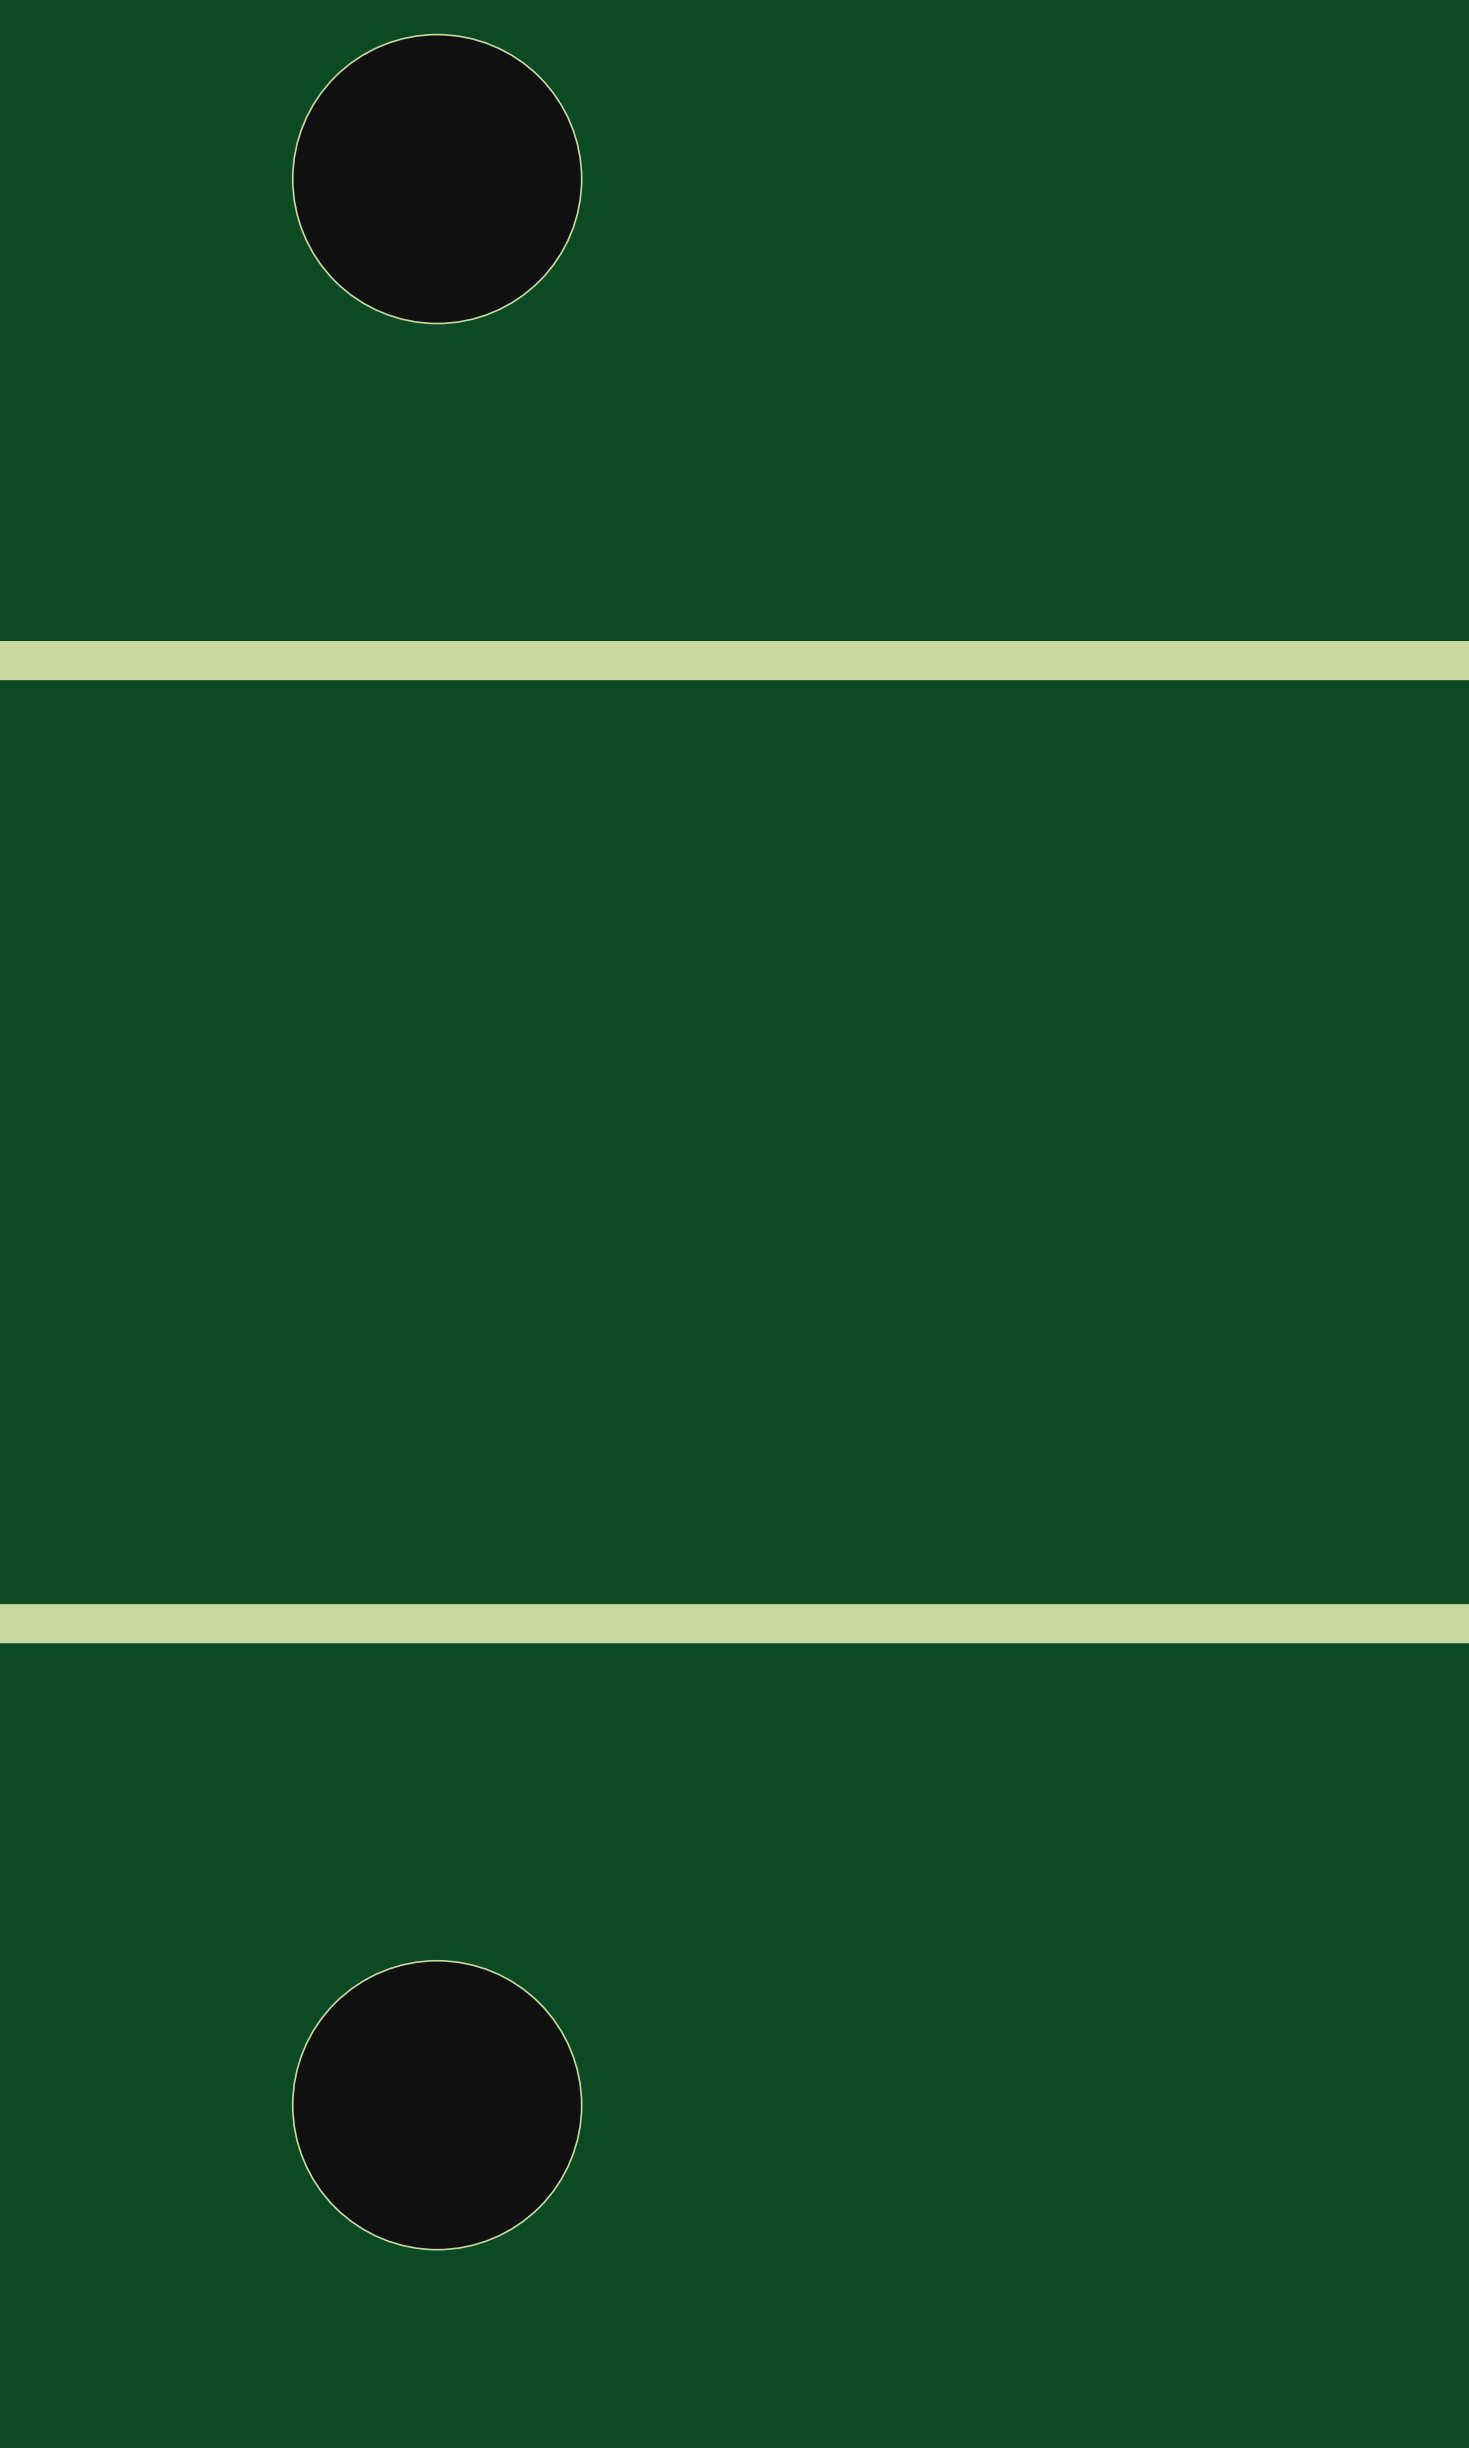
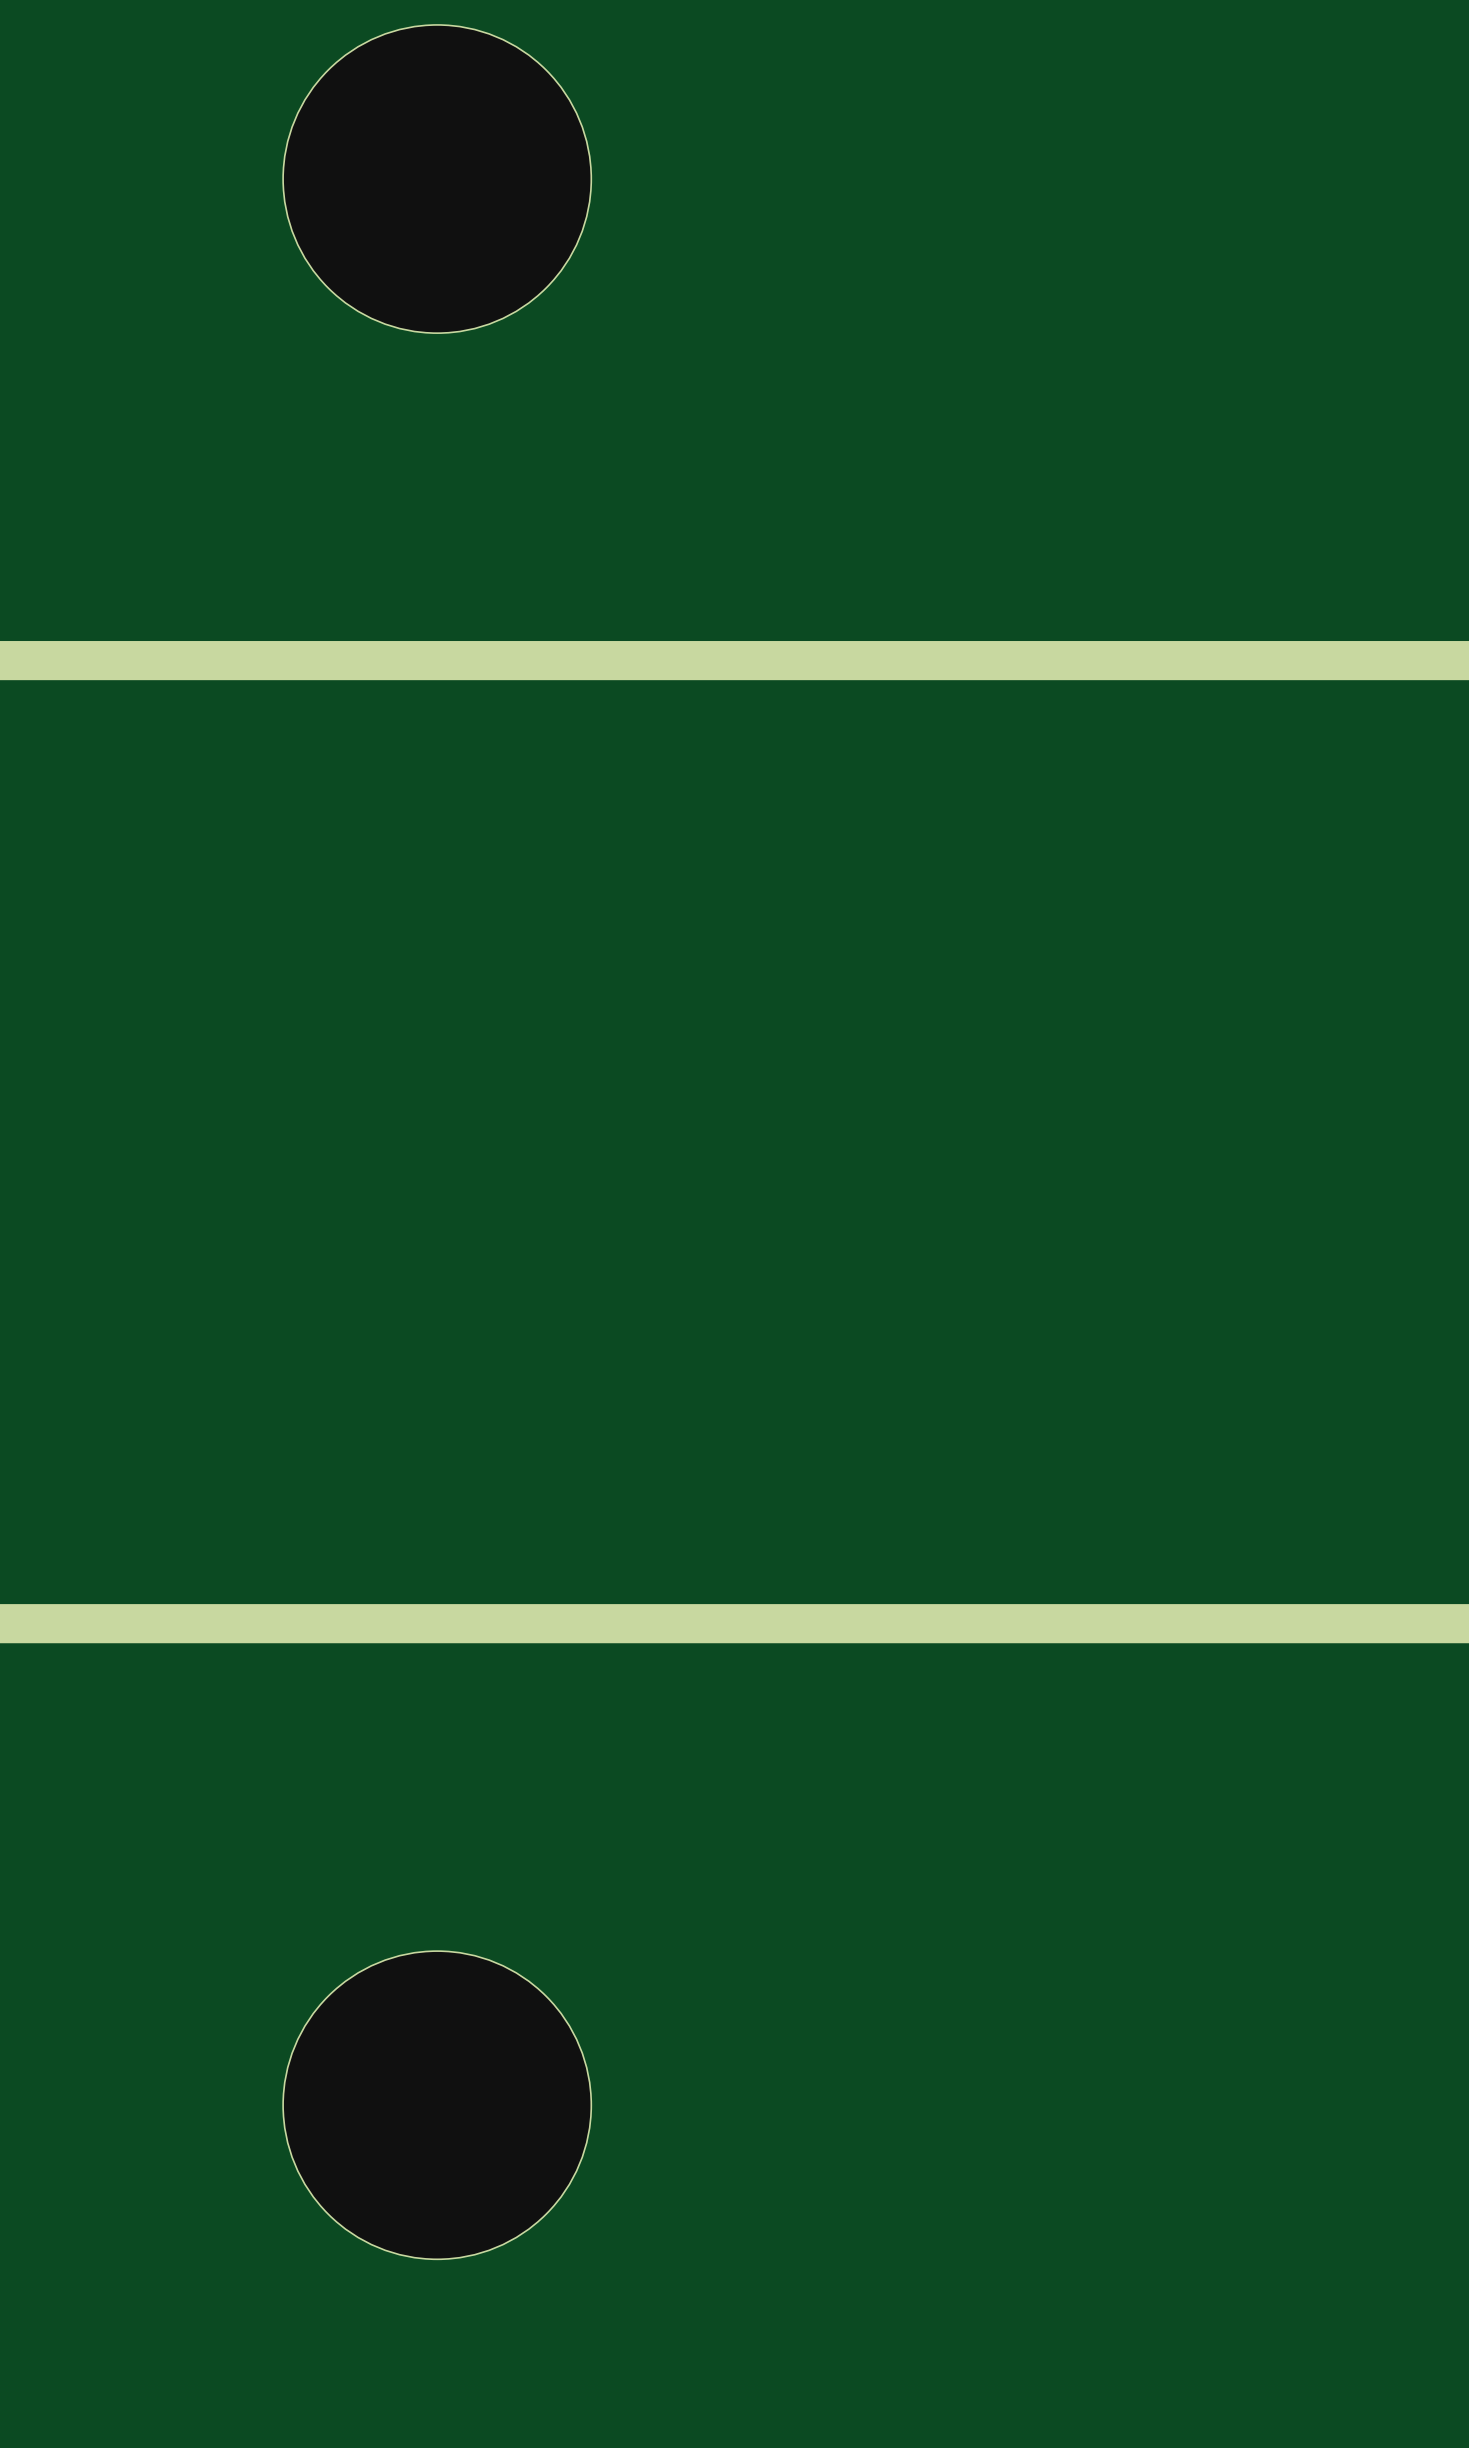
hole size: [292, 34, 582, 324] -> [283, 24, 592, 334]
hole size: [292, 1960, 582, 2250] -> [283, 1951, 592, 2260]

